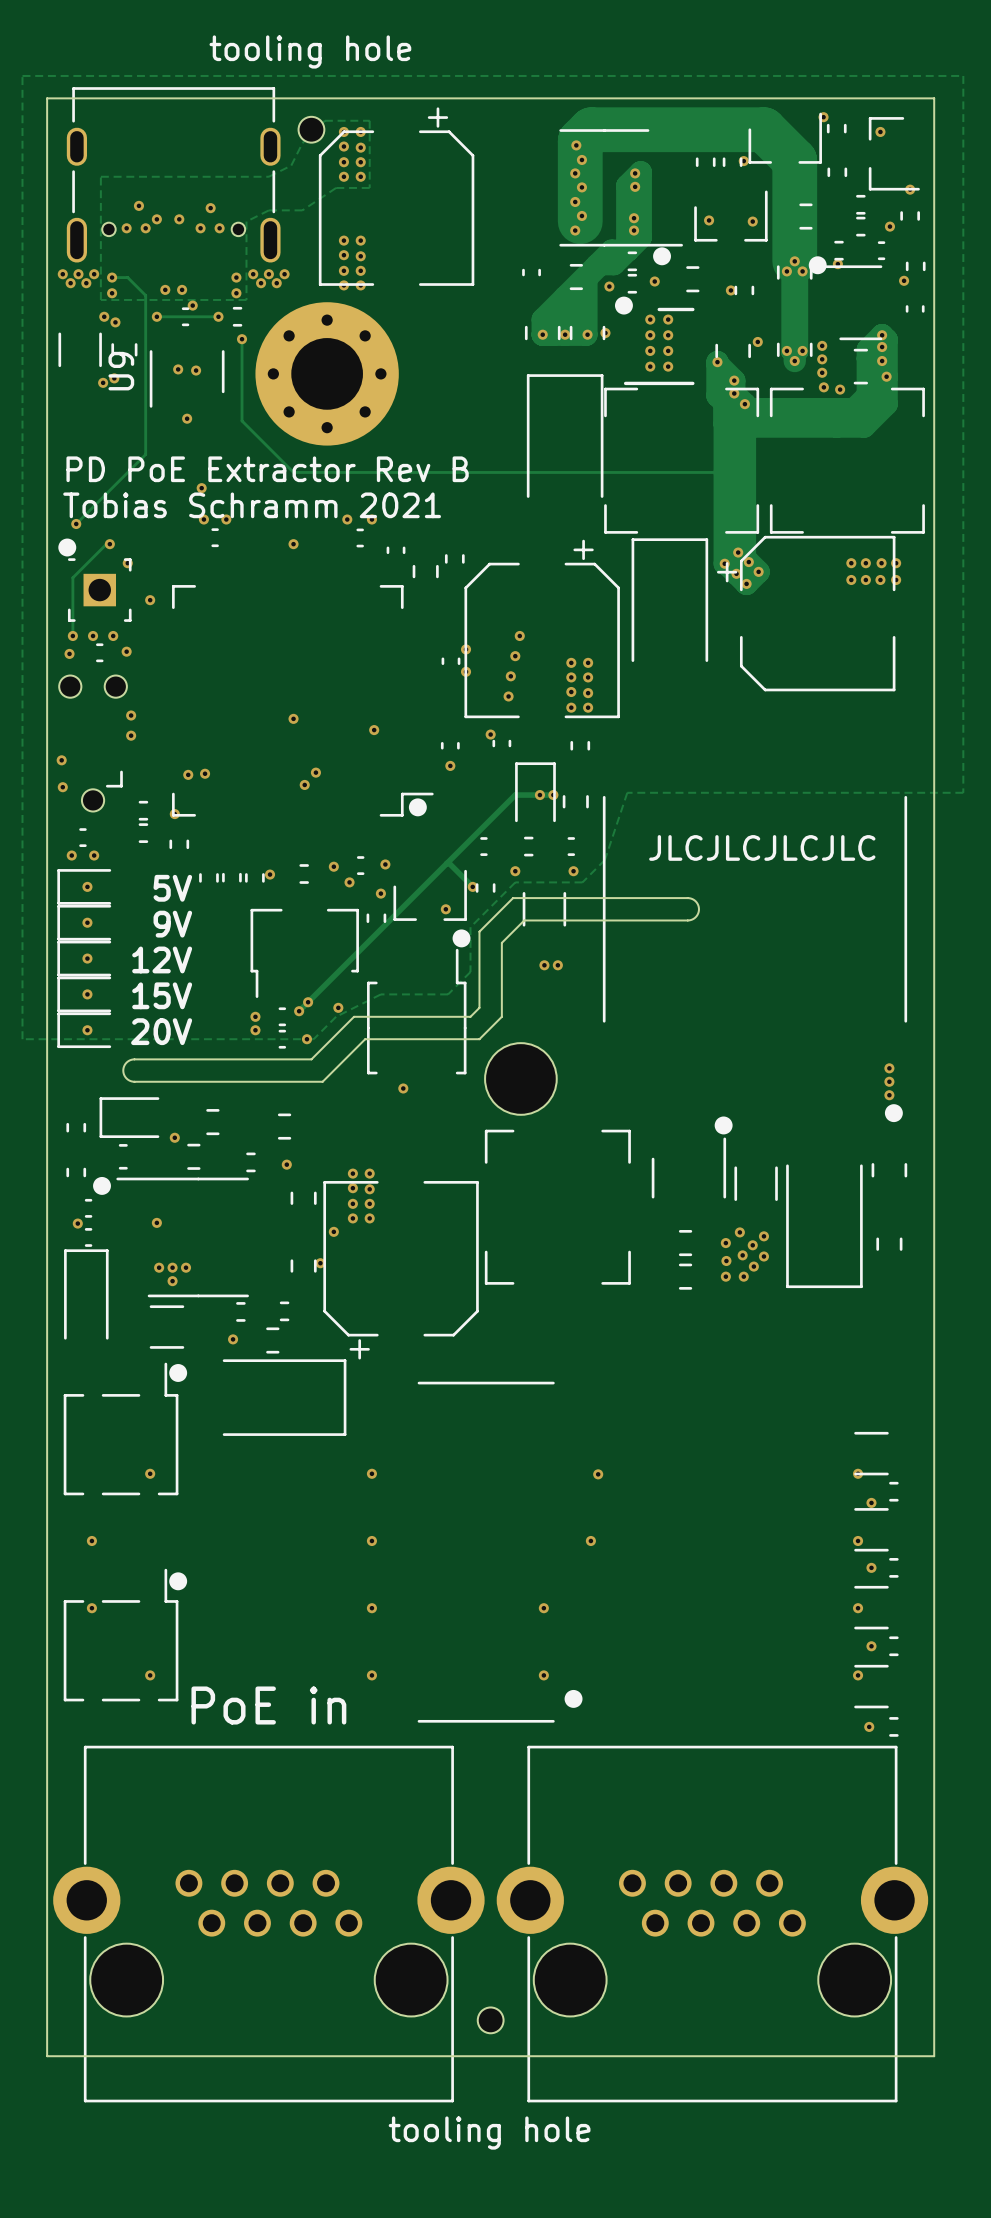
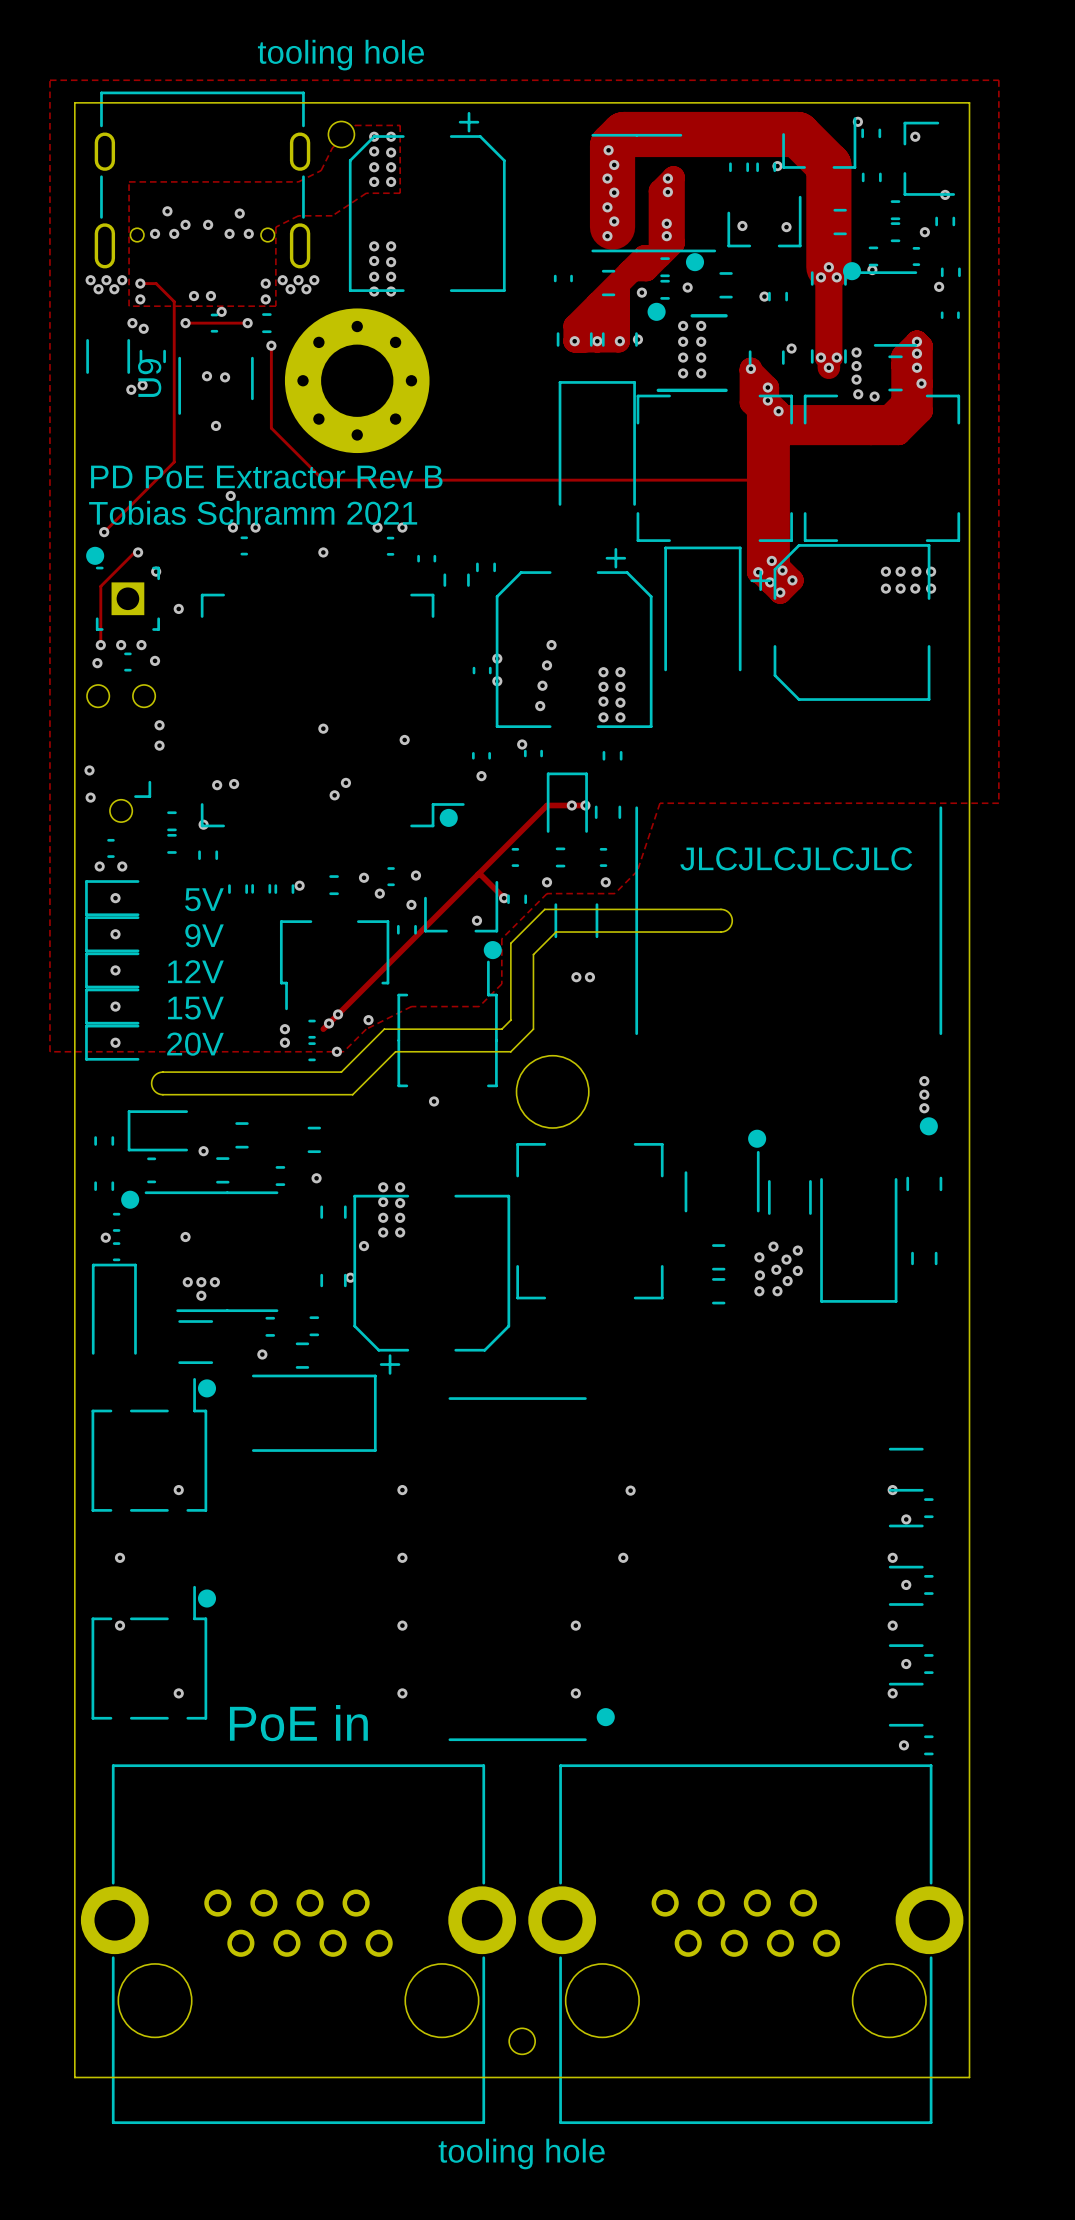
track: none -> (328, 1023) (323, 1029)

